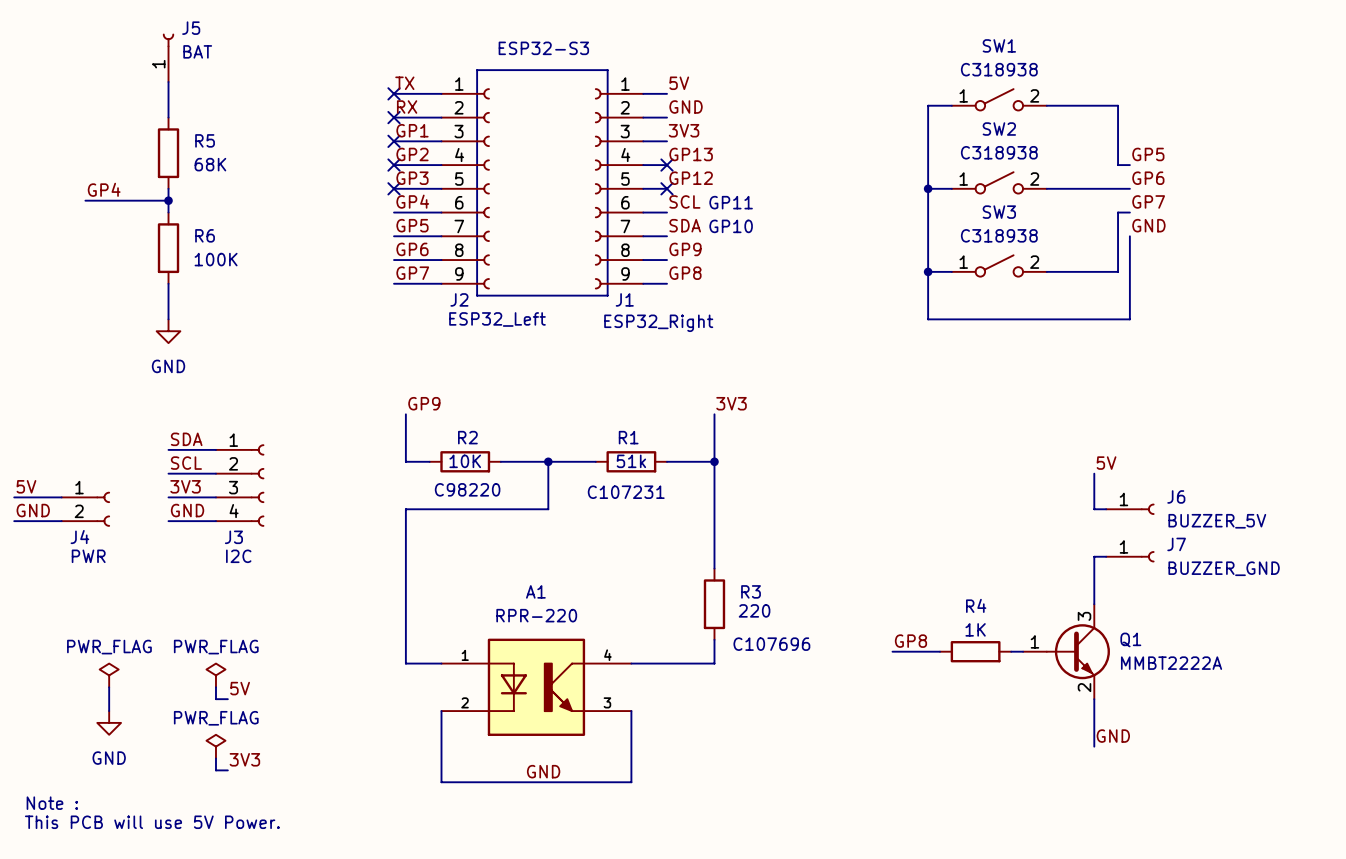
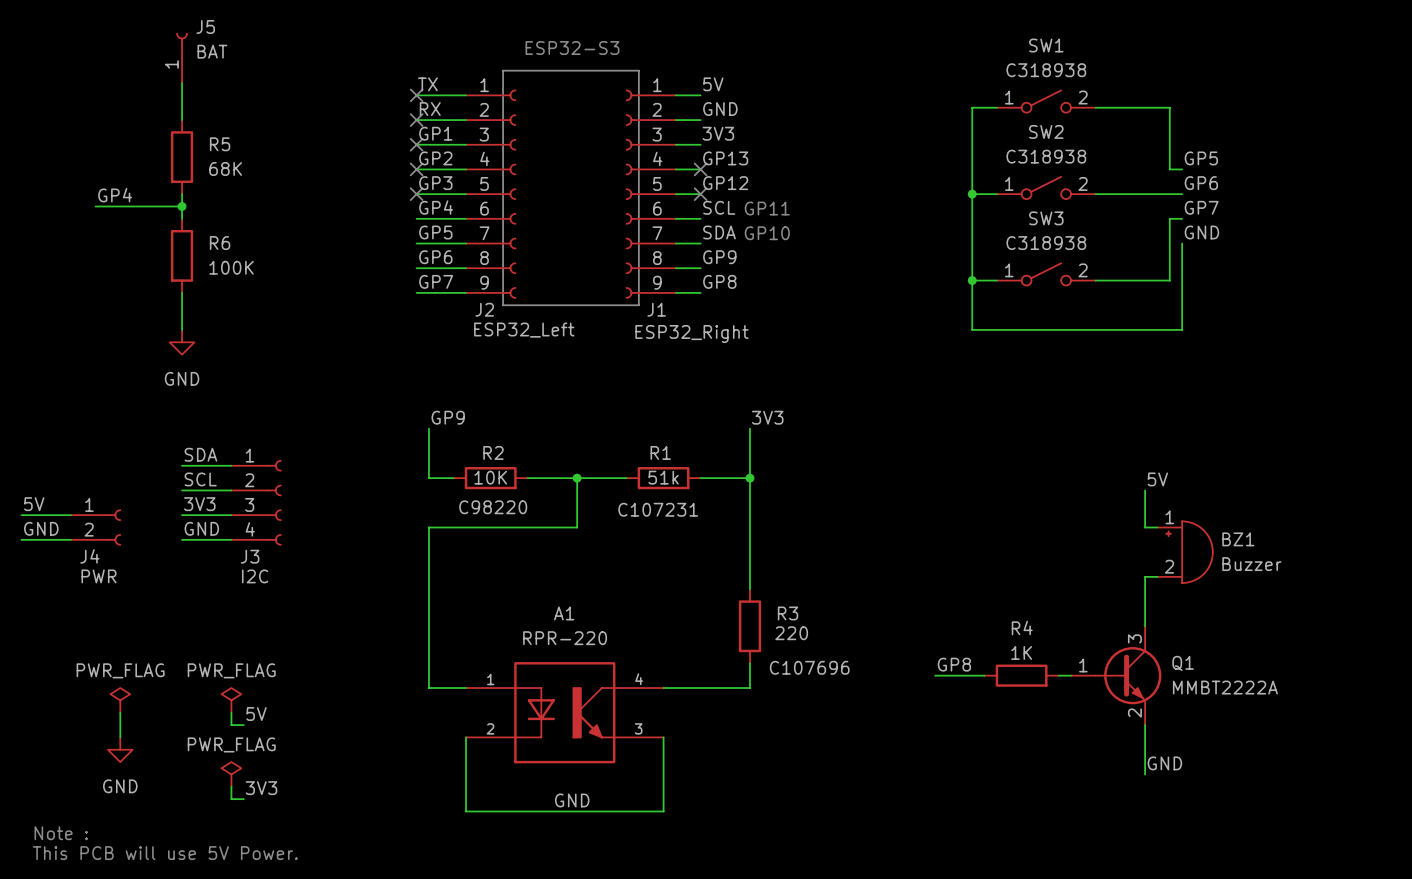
J6: BUZZER_5V (1130, 509) -> none
BZ1: none -> Buzzer (1185, 552)
J7: BUZZER_GND (1130, 556) -> none

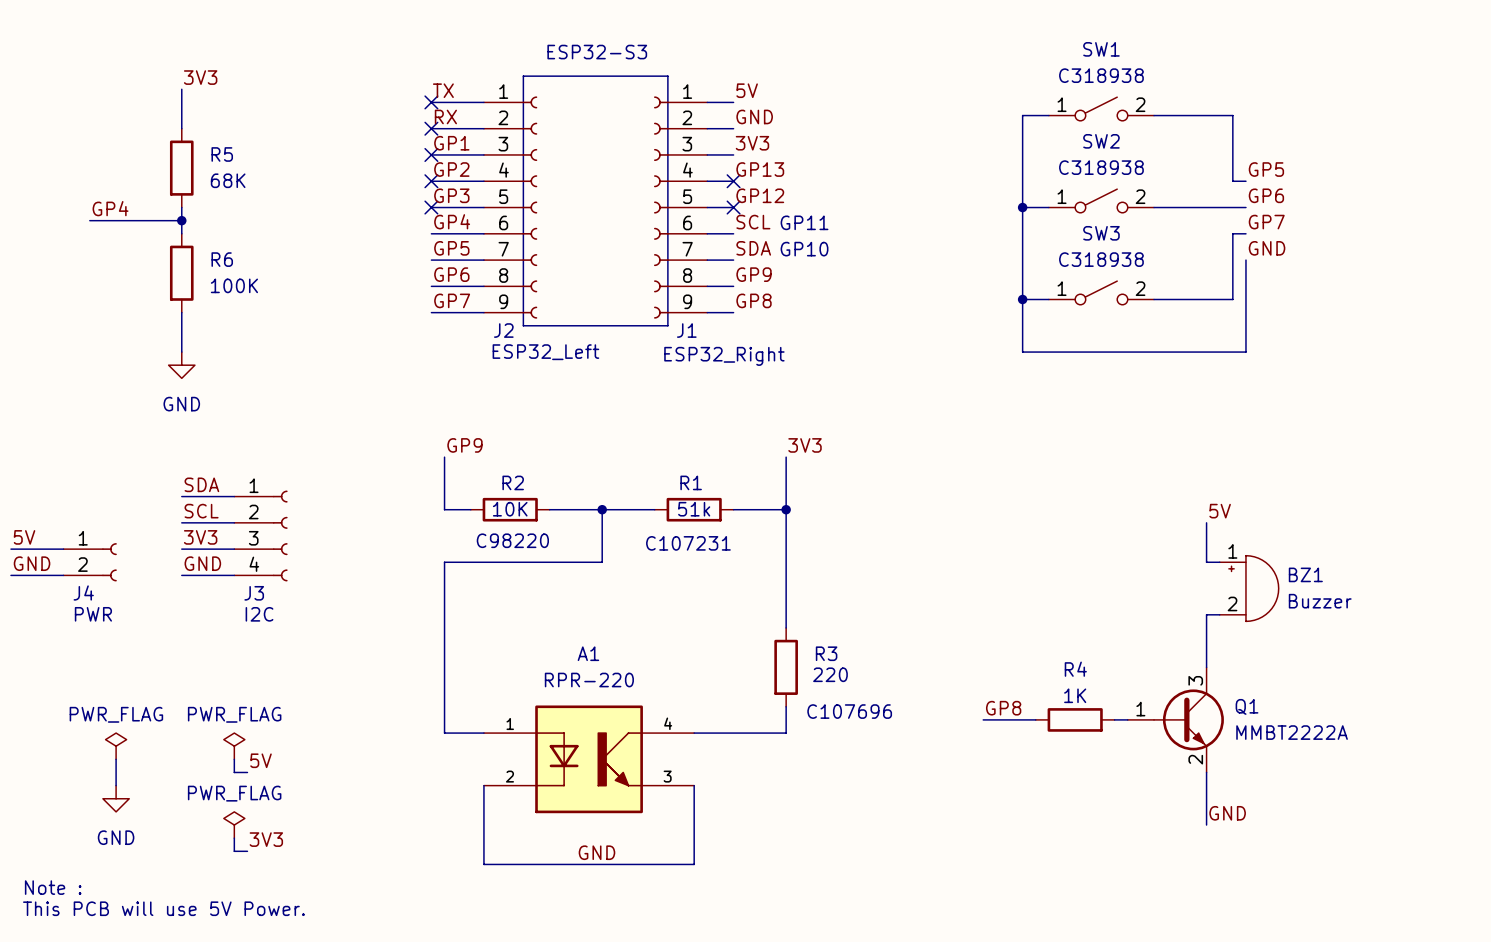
J5: BAT (182, 57) -> none
label: none -> 3V3 (200, 77)

